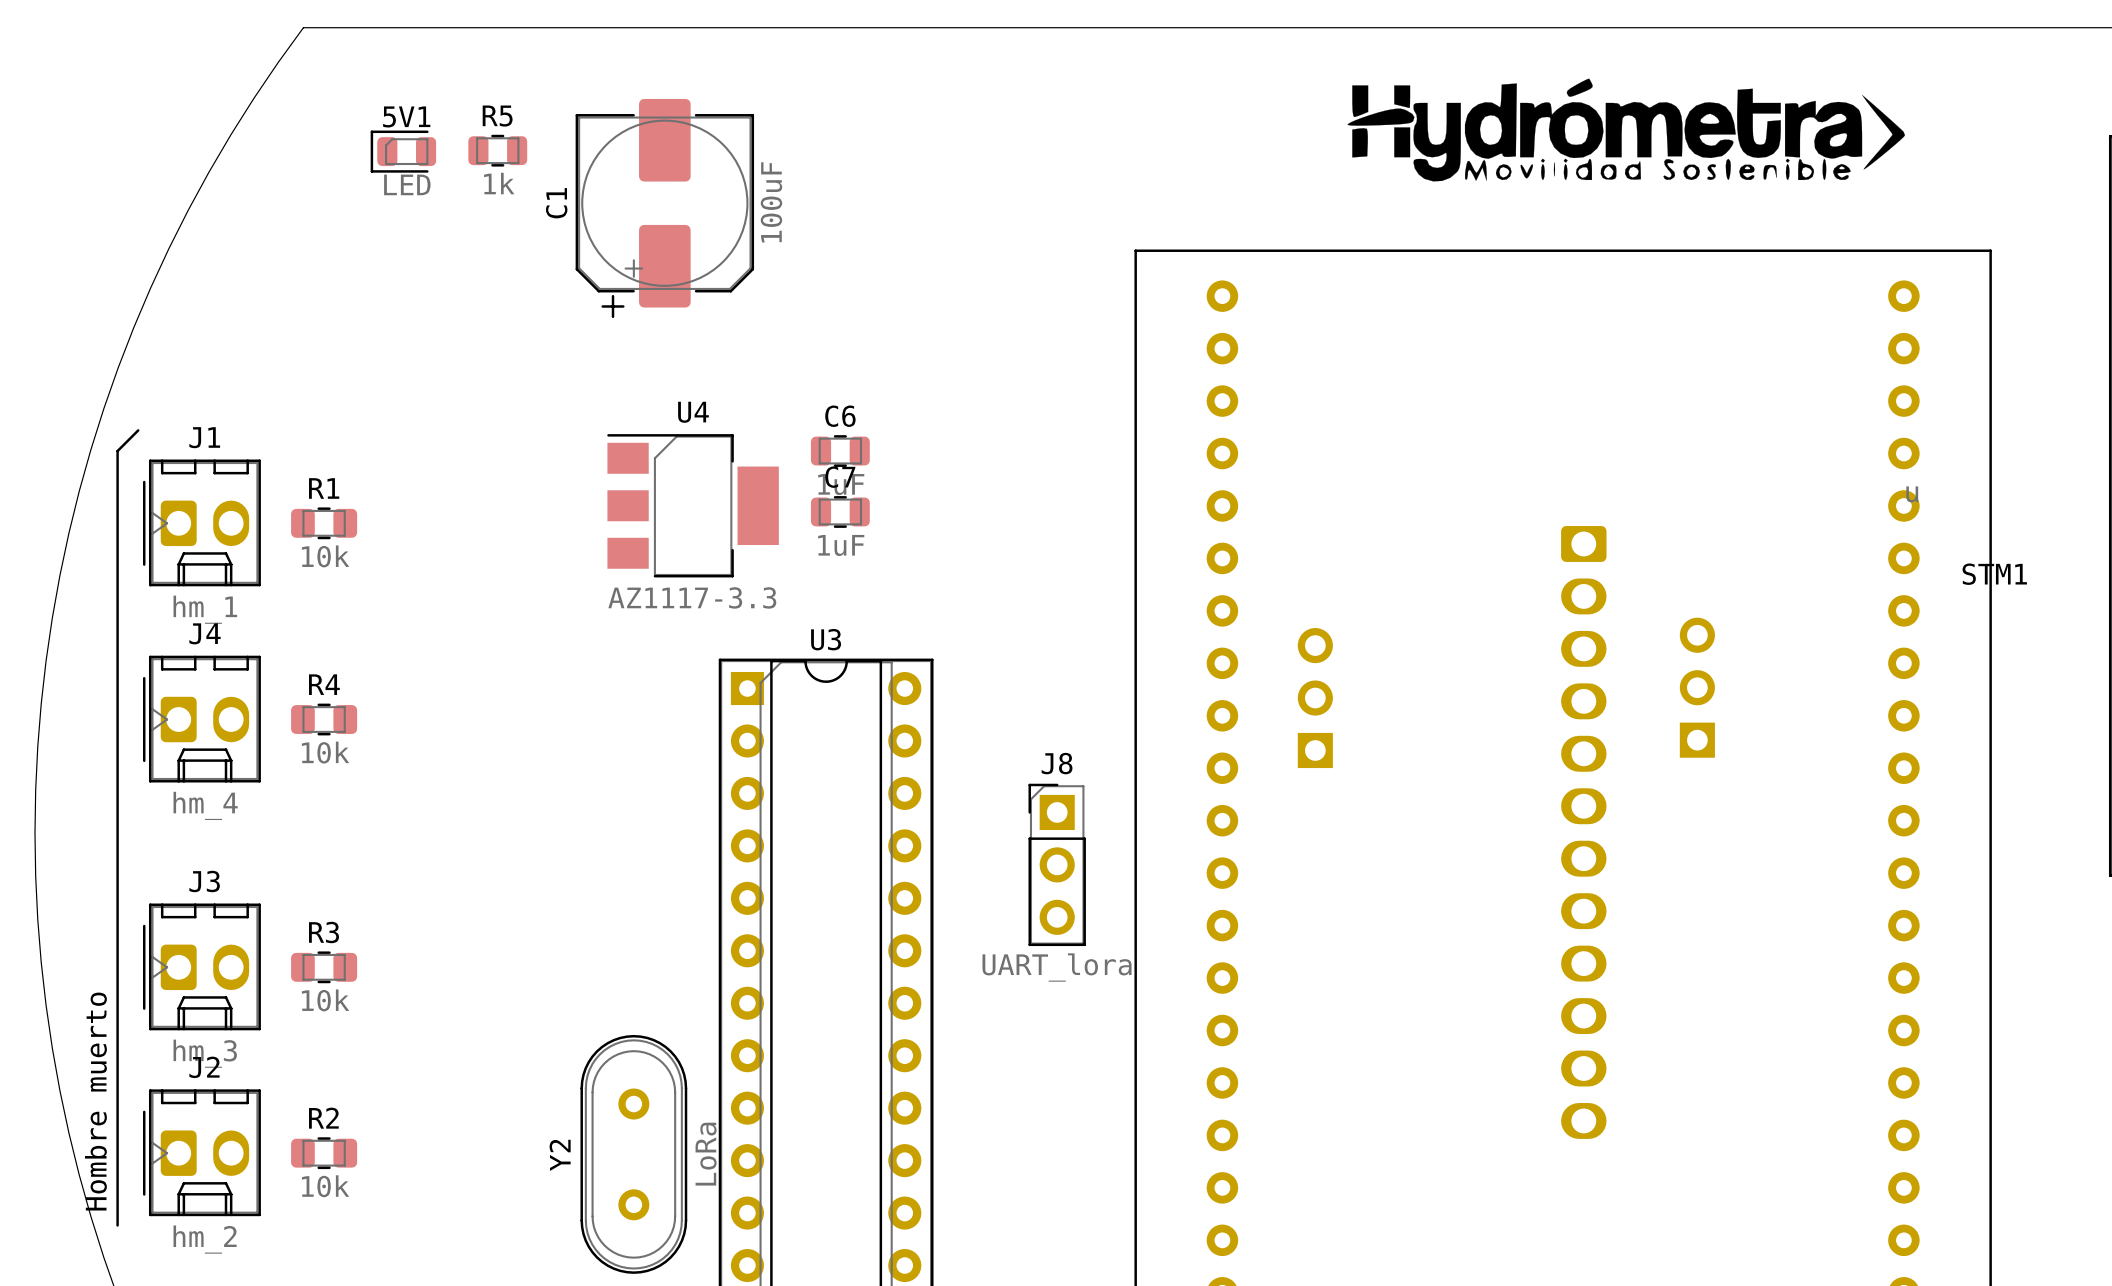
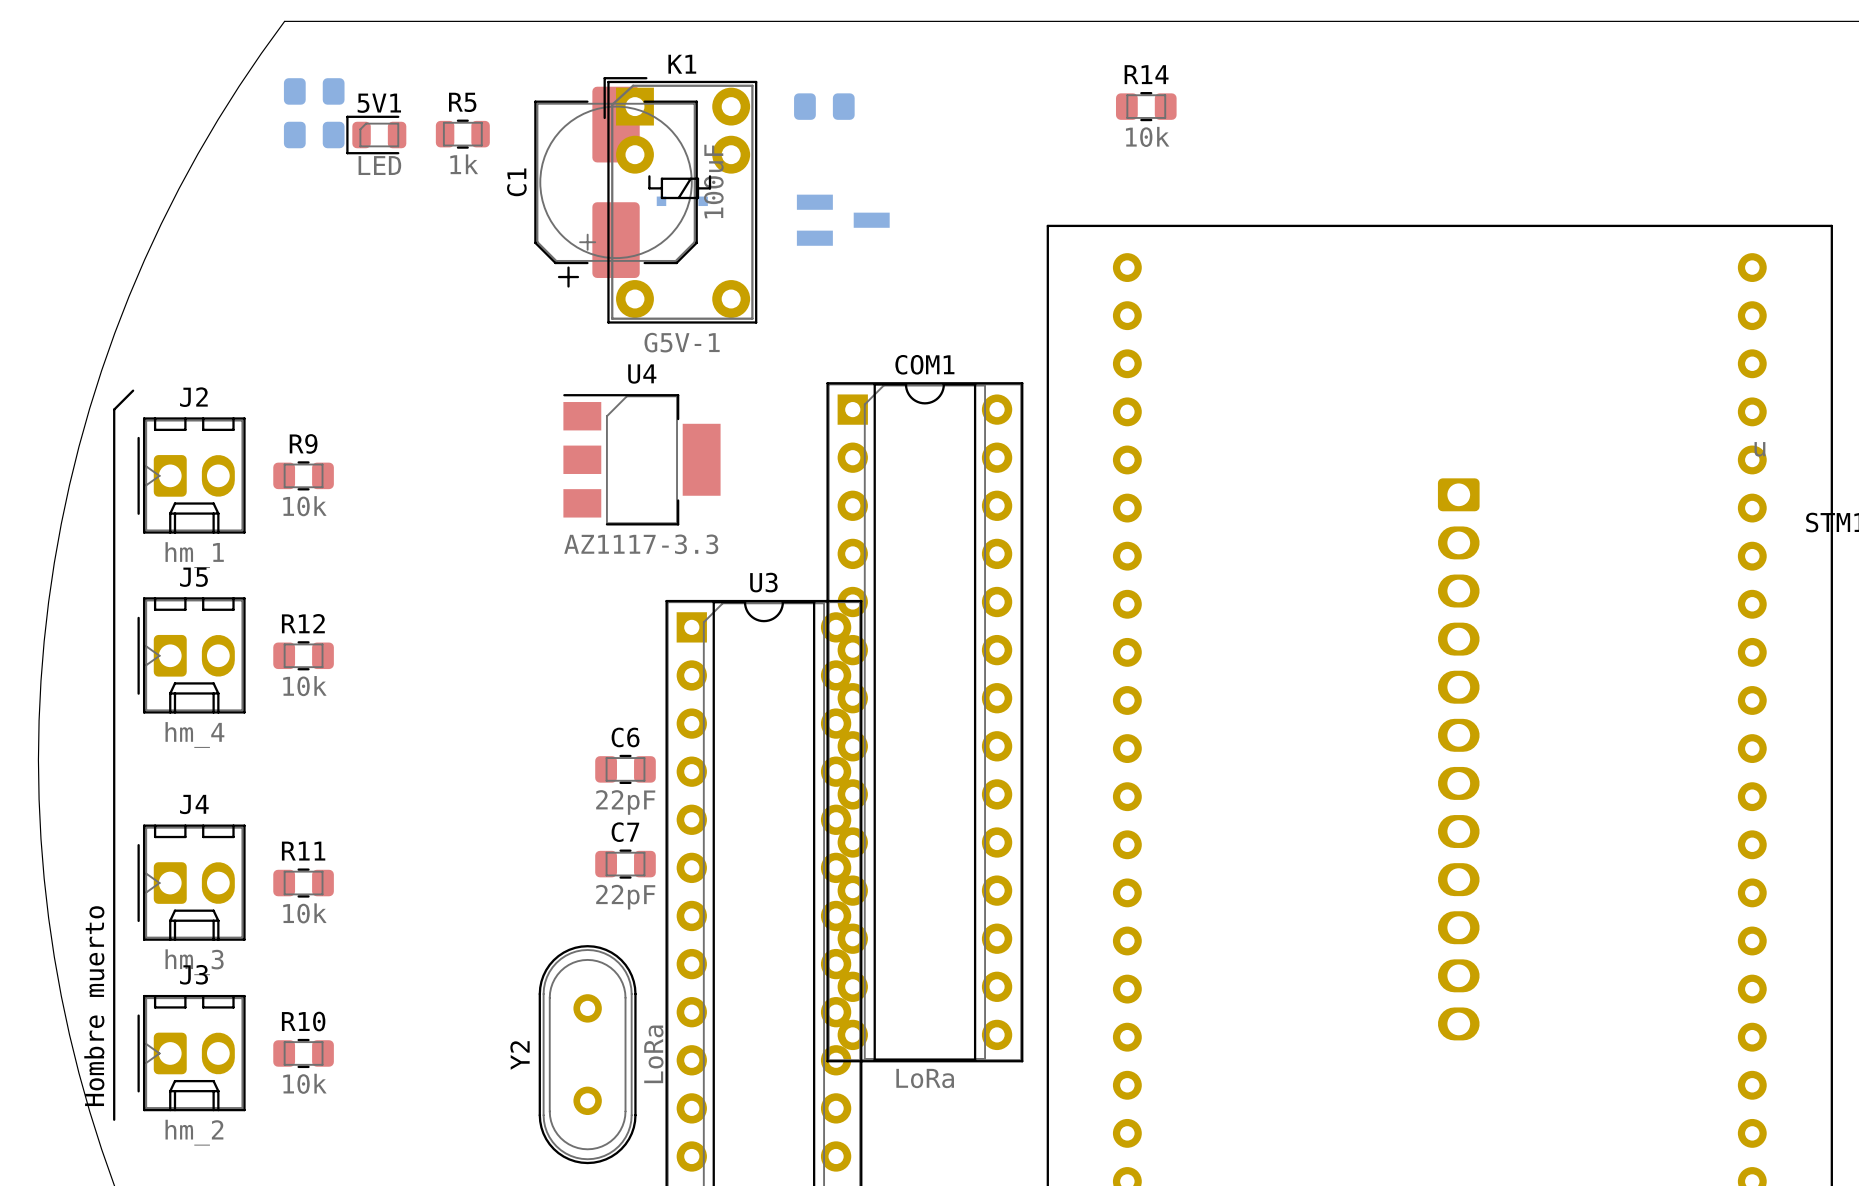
drawing: [1347, 78, 1905, 182] -> none
part: none -> (314, 91)
part: none -> (824, 106)
R14: none -> 10k (1146, 106)
part: none -> (314, 135)
K1: none -> G5V-1 (680, 200)
part: none -> (682, 201)
part: none -> (843, 220)
C6 footprint: [810, 435, 870, 467] -> [595, 754, 656, 784]
J1 name: J1 (204, 437) -> J2 (193, 397)
C6 value: 1uF (841, 484) -> 22pF (625, 802)
R1 name: R1 (324, 488) -> R9 (303, 443)
C7 footprint: [810, 496, 870, 528] -> [595, 849, 656, 879]
C7 value: 1uF (841, 545) -> 22pF (625, 897)
J4 name: J4 (205, 633) -> J5 (193, 577)
R4 name: R4 (324, 684) -> R12 (303, 623)
part: (1697, 687) -> none
part: (1315, 698) -> none
COM1: none -> LoRa (924, 722)
J8: UART_lora (1057, 864) -> none
J3 name: J3 (204, 881) -> J4 (194, 804)
R3 name: R3 (324, 932) -> R11 (303, 851)
J2 name: J2 (204, 1067) -> J3 (194, 974)
R2 name: R2 (323, 1118) -> R10 (303, 1021)

